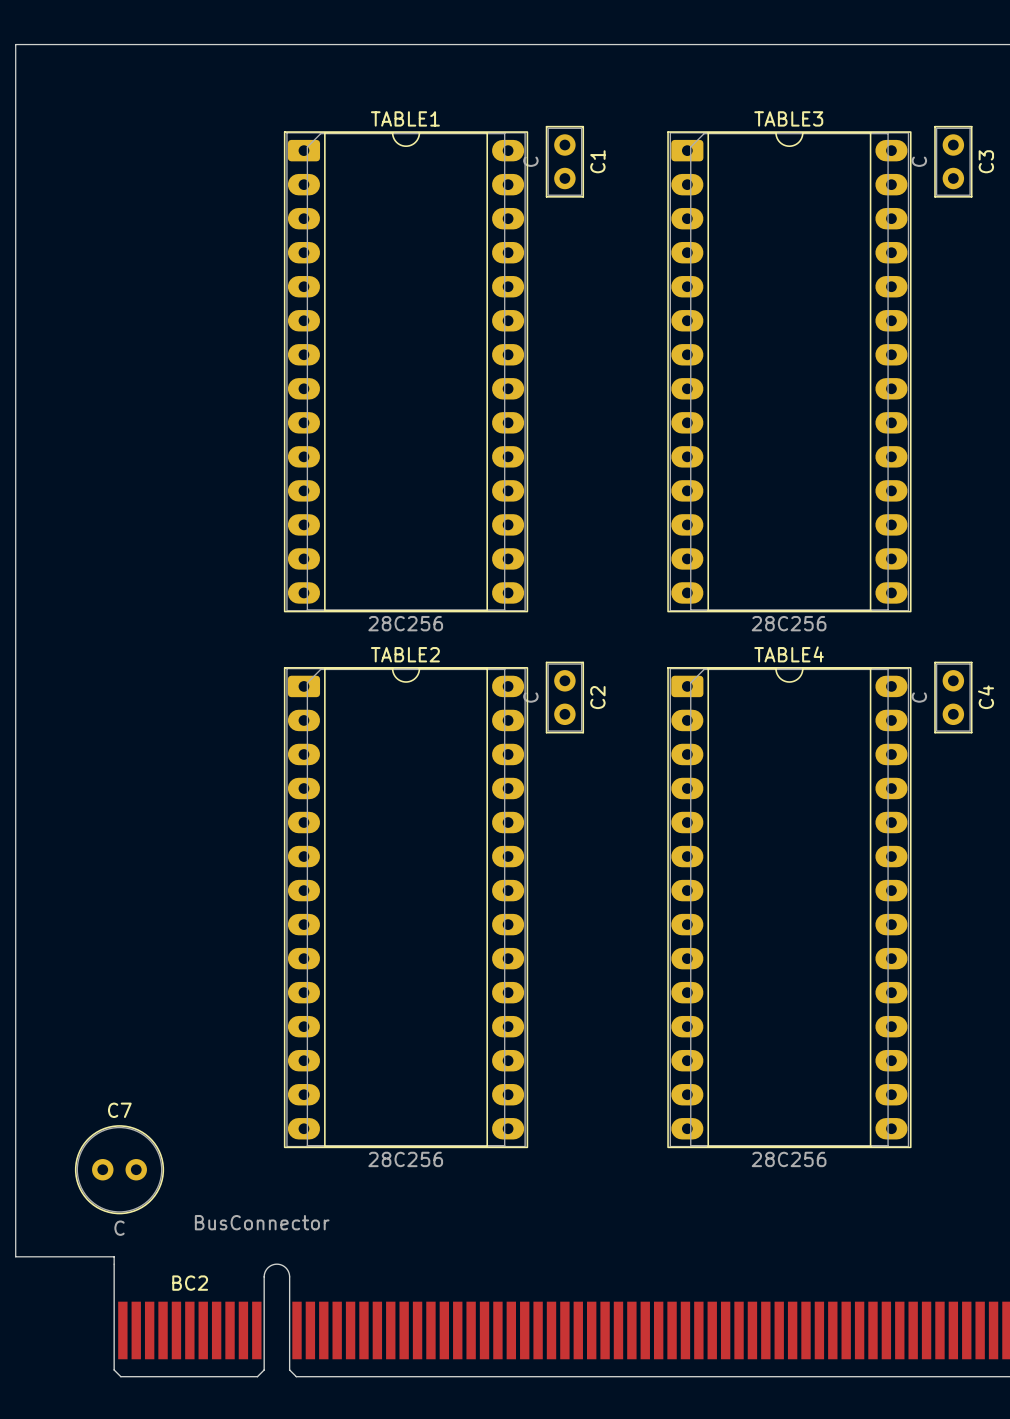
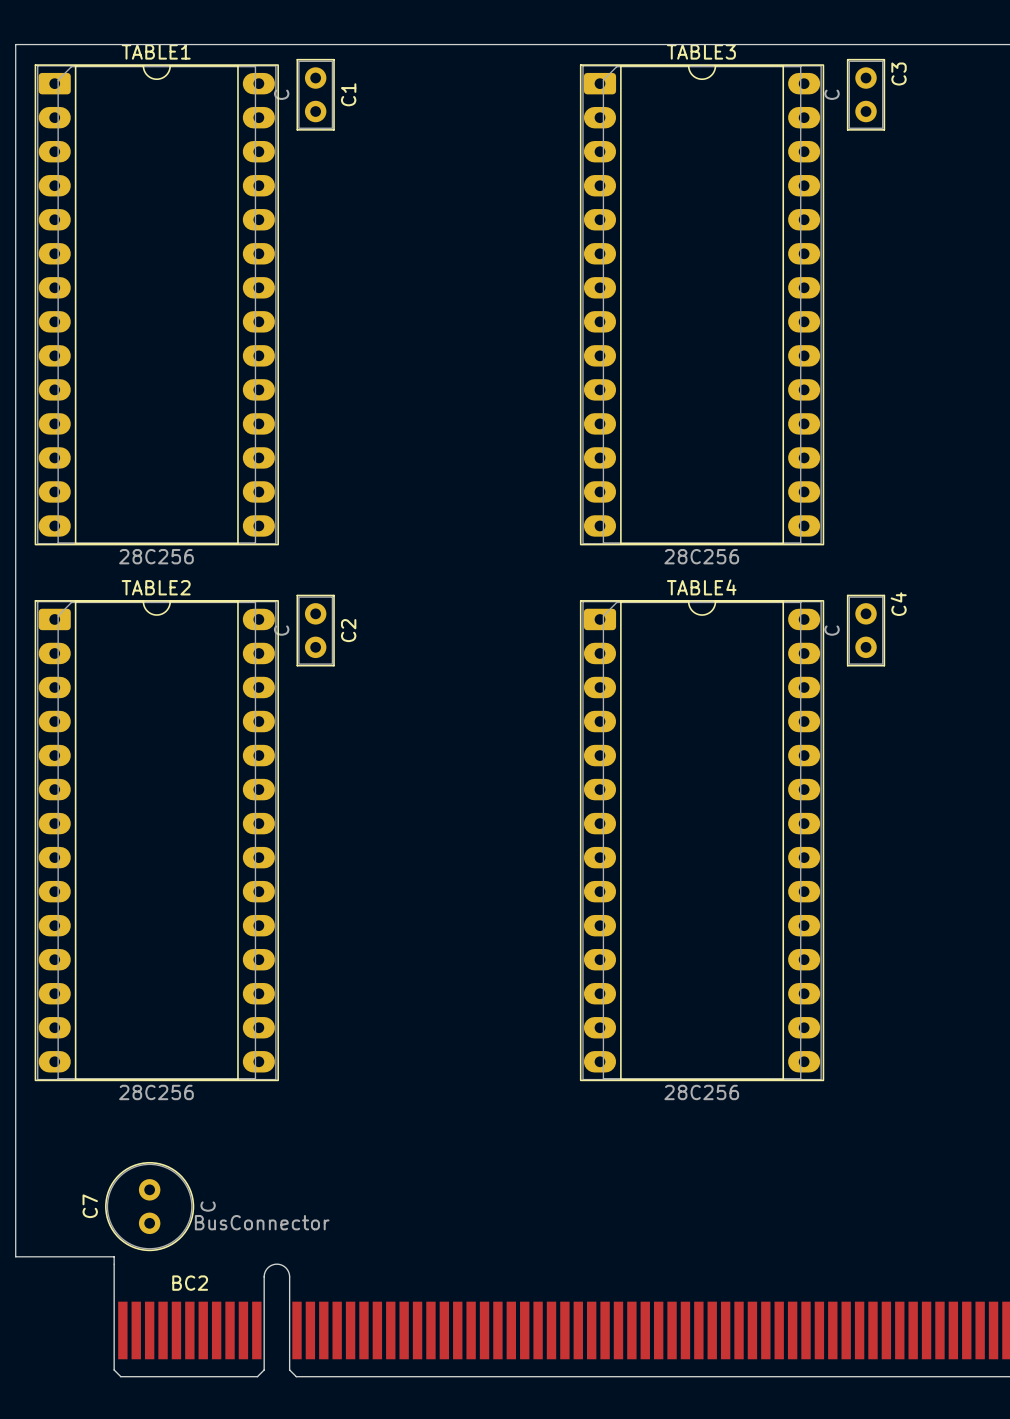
C1 position: (564, 161) -> (315, 94)
C3 position: (953, 161) -> (866, 94)
C3 name position: C3 (986, 161) -> C3 (899, 74)
TABLE1 position: (406, 371) -> (156, 304)
TABLE3 position: (789, 371) -> (702, 304)
C2 position: (564, 697) -> (315, 630)
C4 position: (953, 697) -> (866, 630)
C4 name position: C4 (986, 697) -> C4 (898, 604)
TABLE2 position: (406, 907) -> (156, 840)
TABLE4 position: (789, 907) -> (702, 840)
C7 name position: C7 (119, 1110) -> C7 (90, 1206)
C7 rotation: 0° (119, 1169) -> 90° clockwise (149, 1206)
C7 value position: C (119, 1228) -> C (208, 1206)

